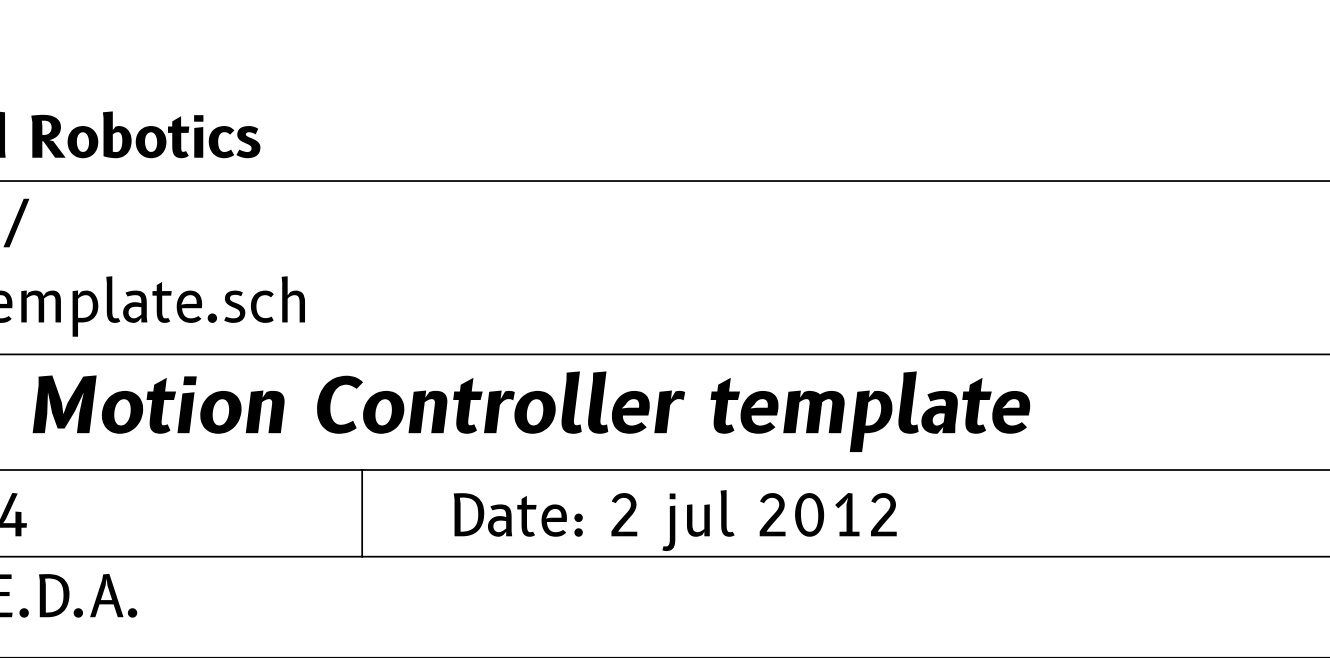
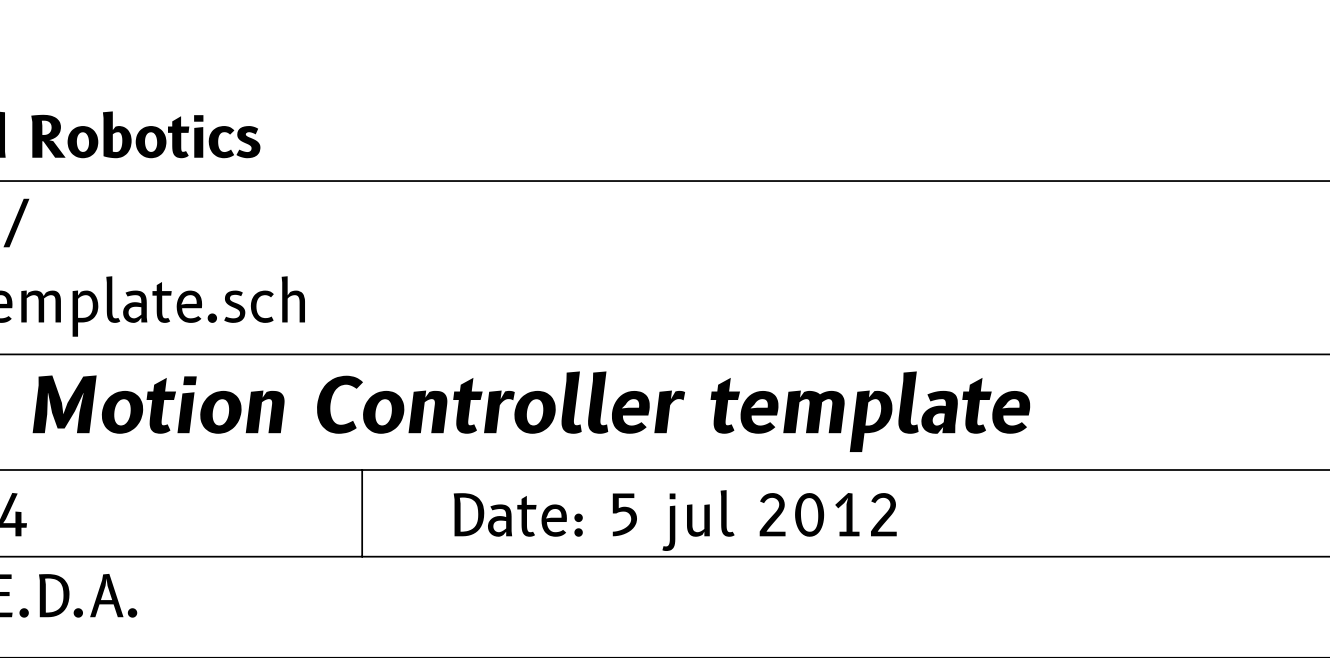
title block: Date: 2 jul 2012 (675, 520) -> Date: 5 jul 2012 (675, 520)

